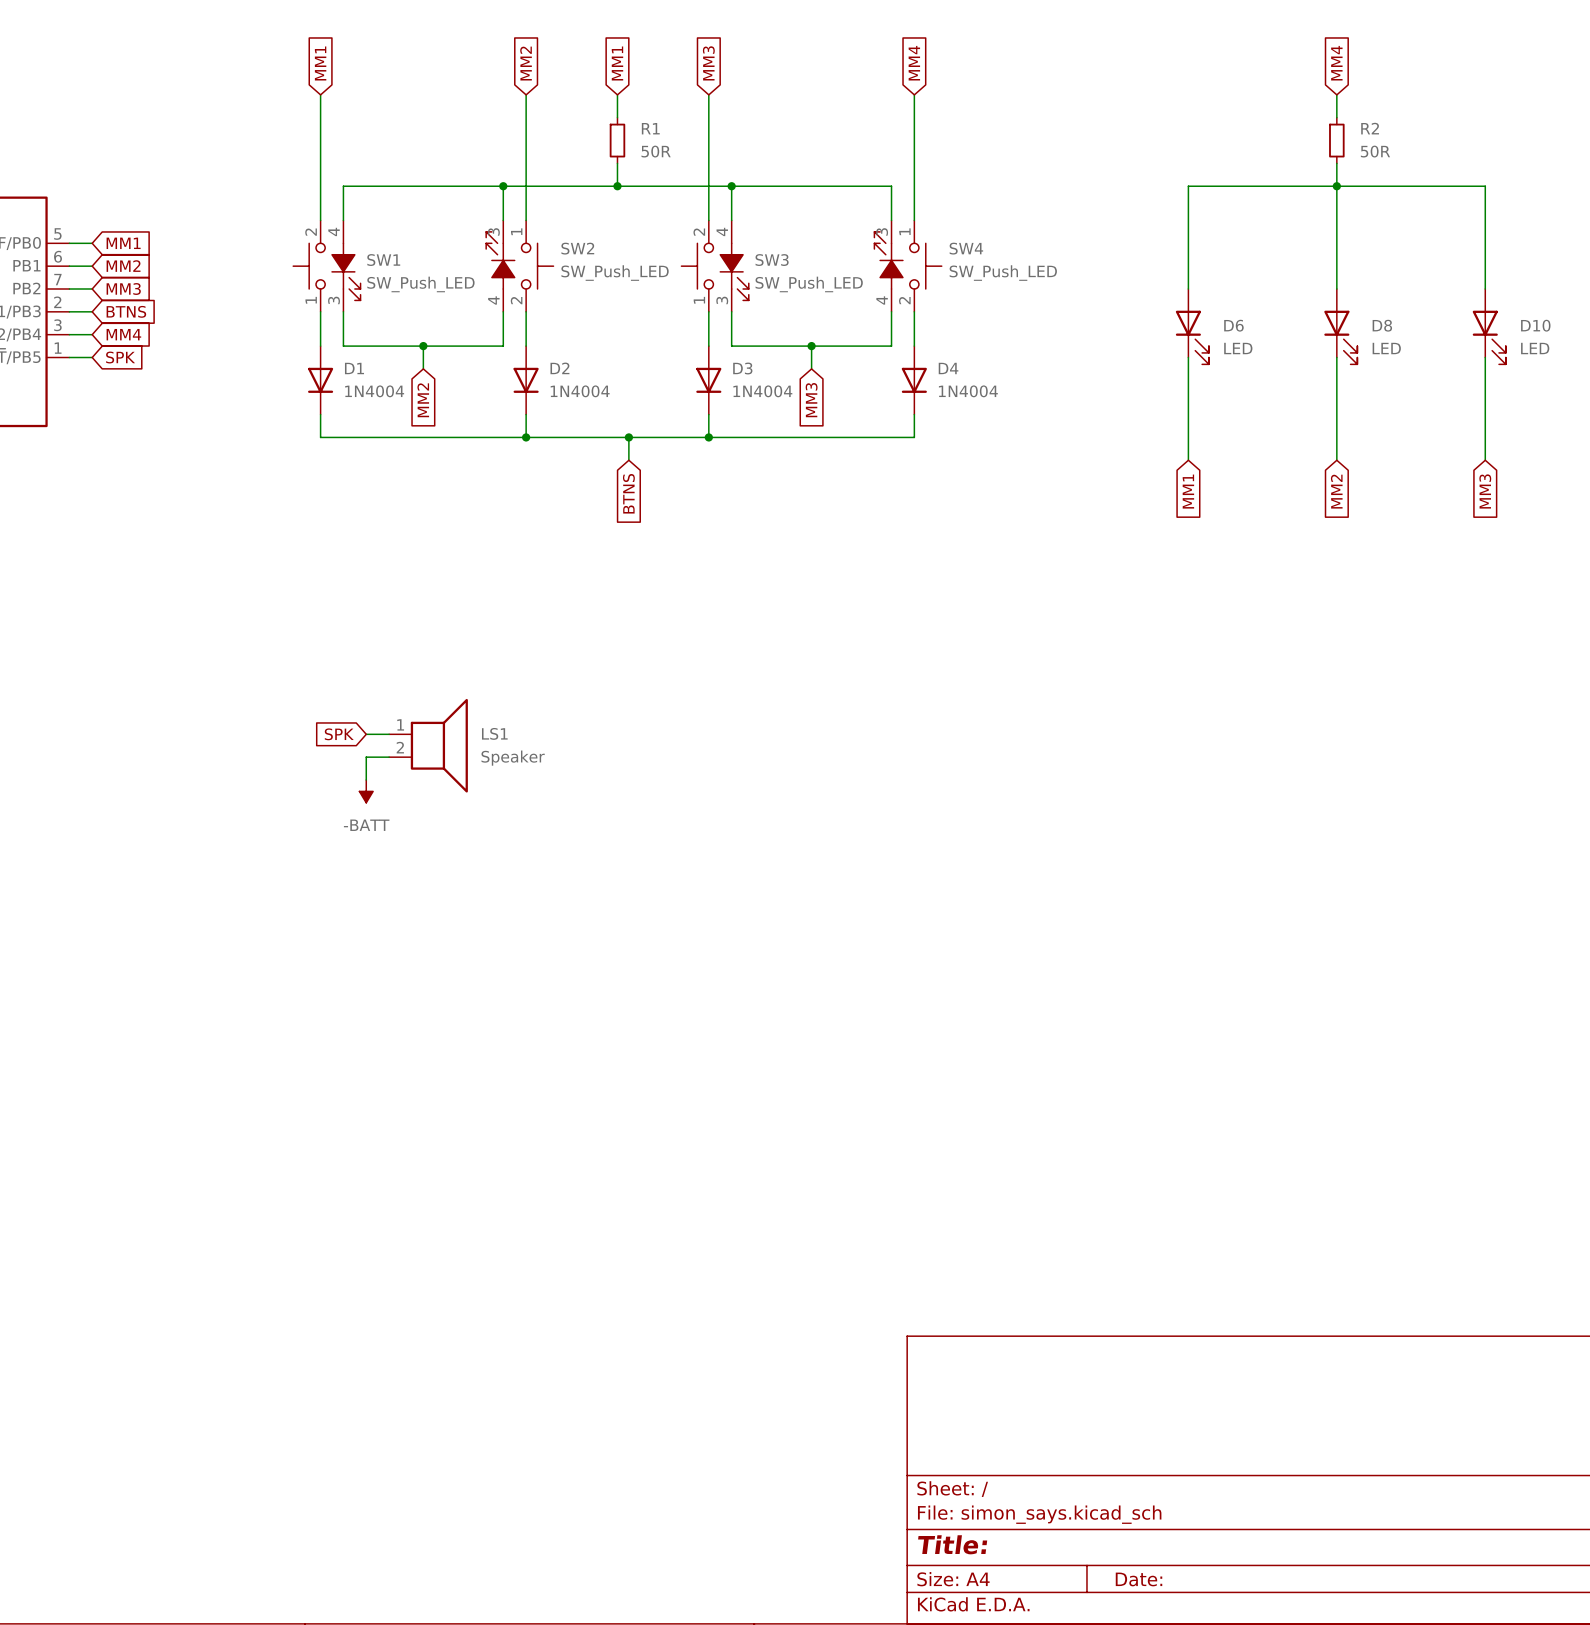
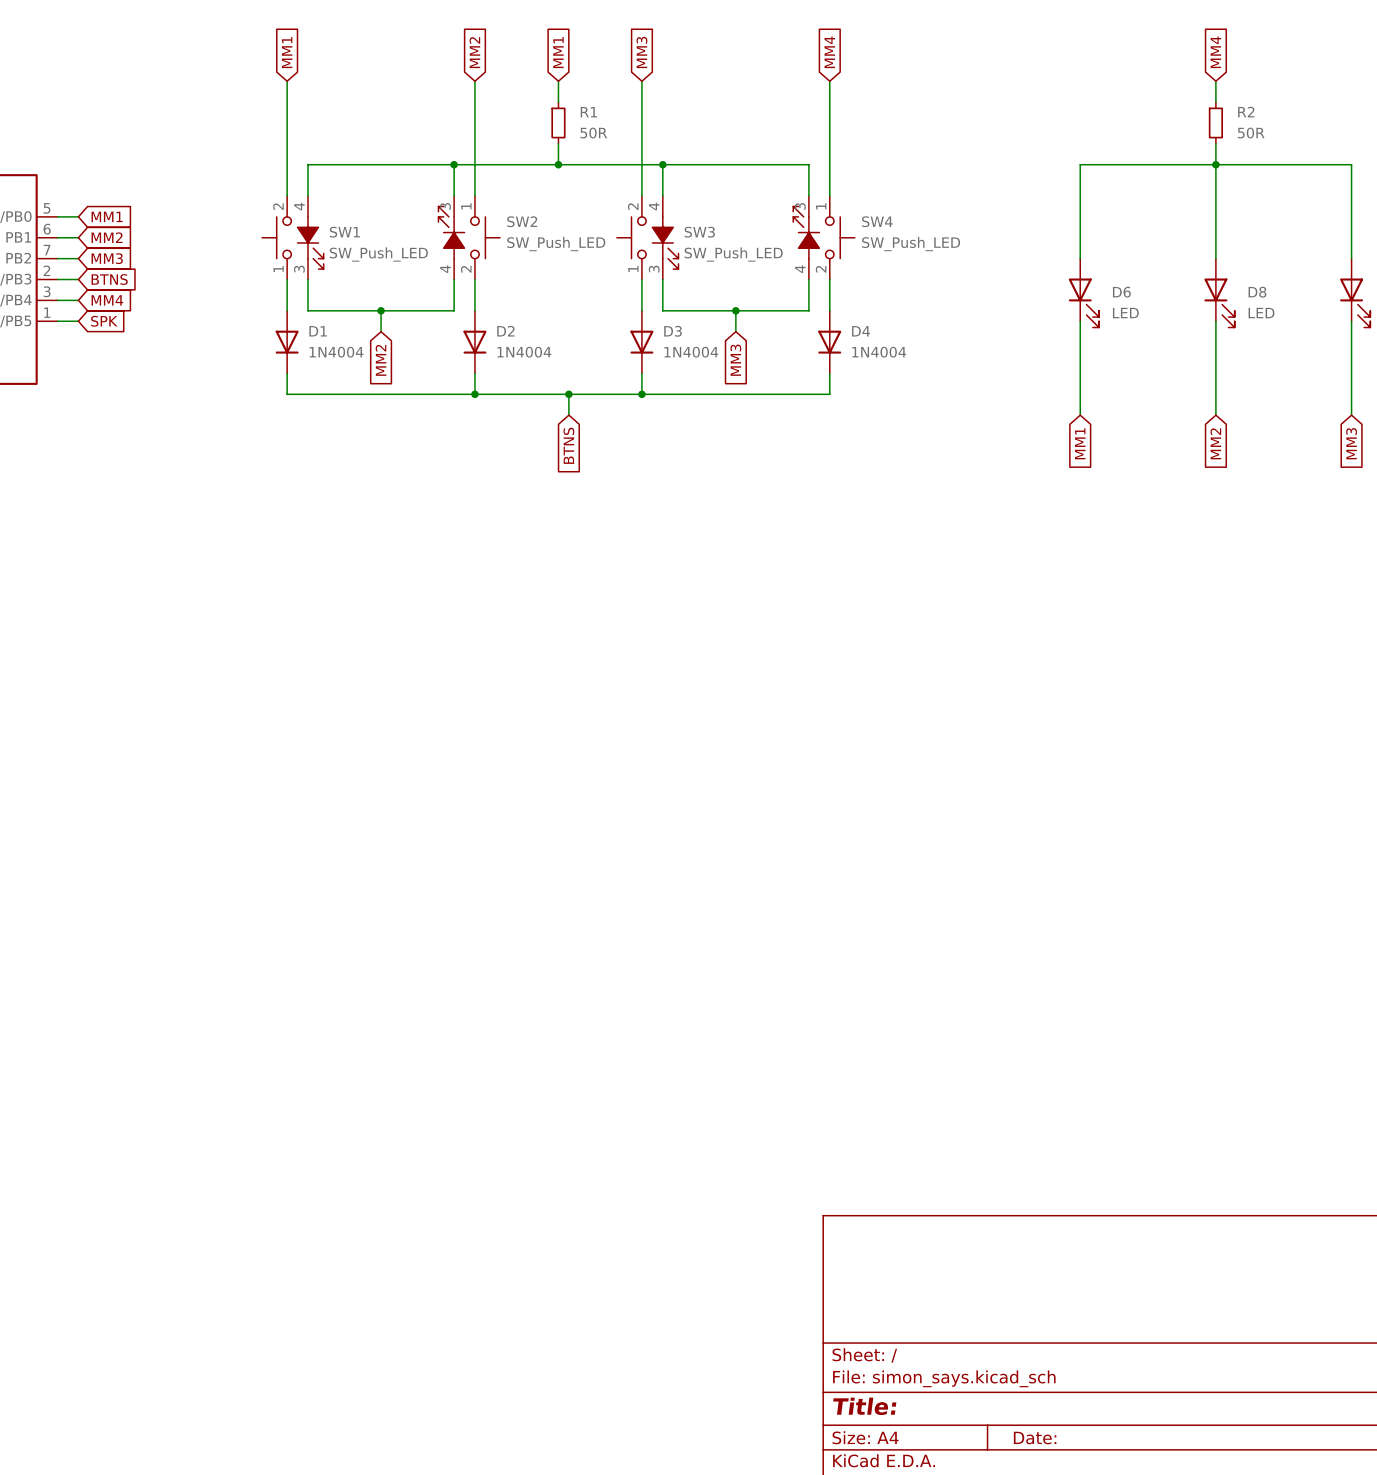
global label: SPK (339, 734) -> none
wire: (366, 734) (389, 734) -> none
LS1: Speaker (428, 745) -> none
wire: (389, 757) (366, 757) (366, 779) -> none
power symbol: -BATT (366, 791) -> none

